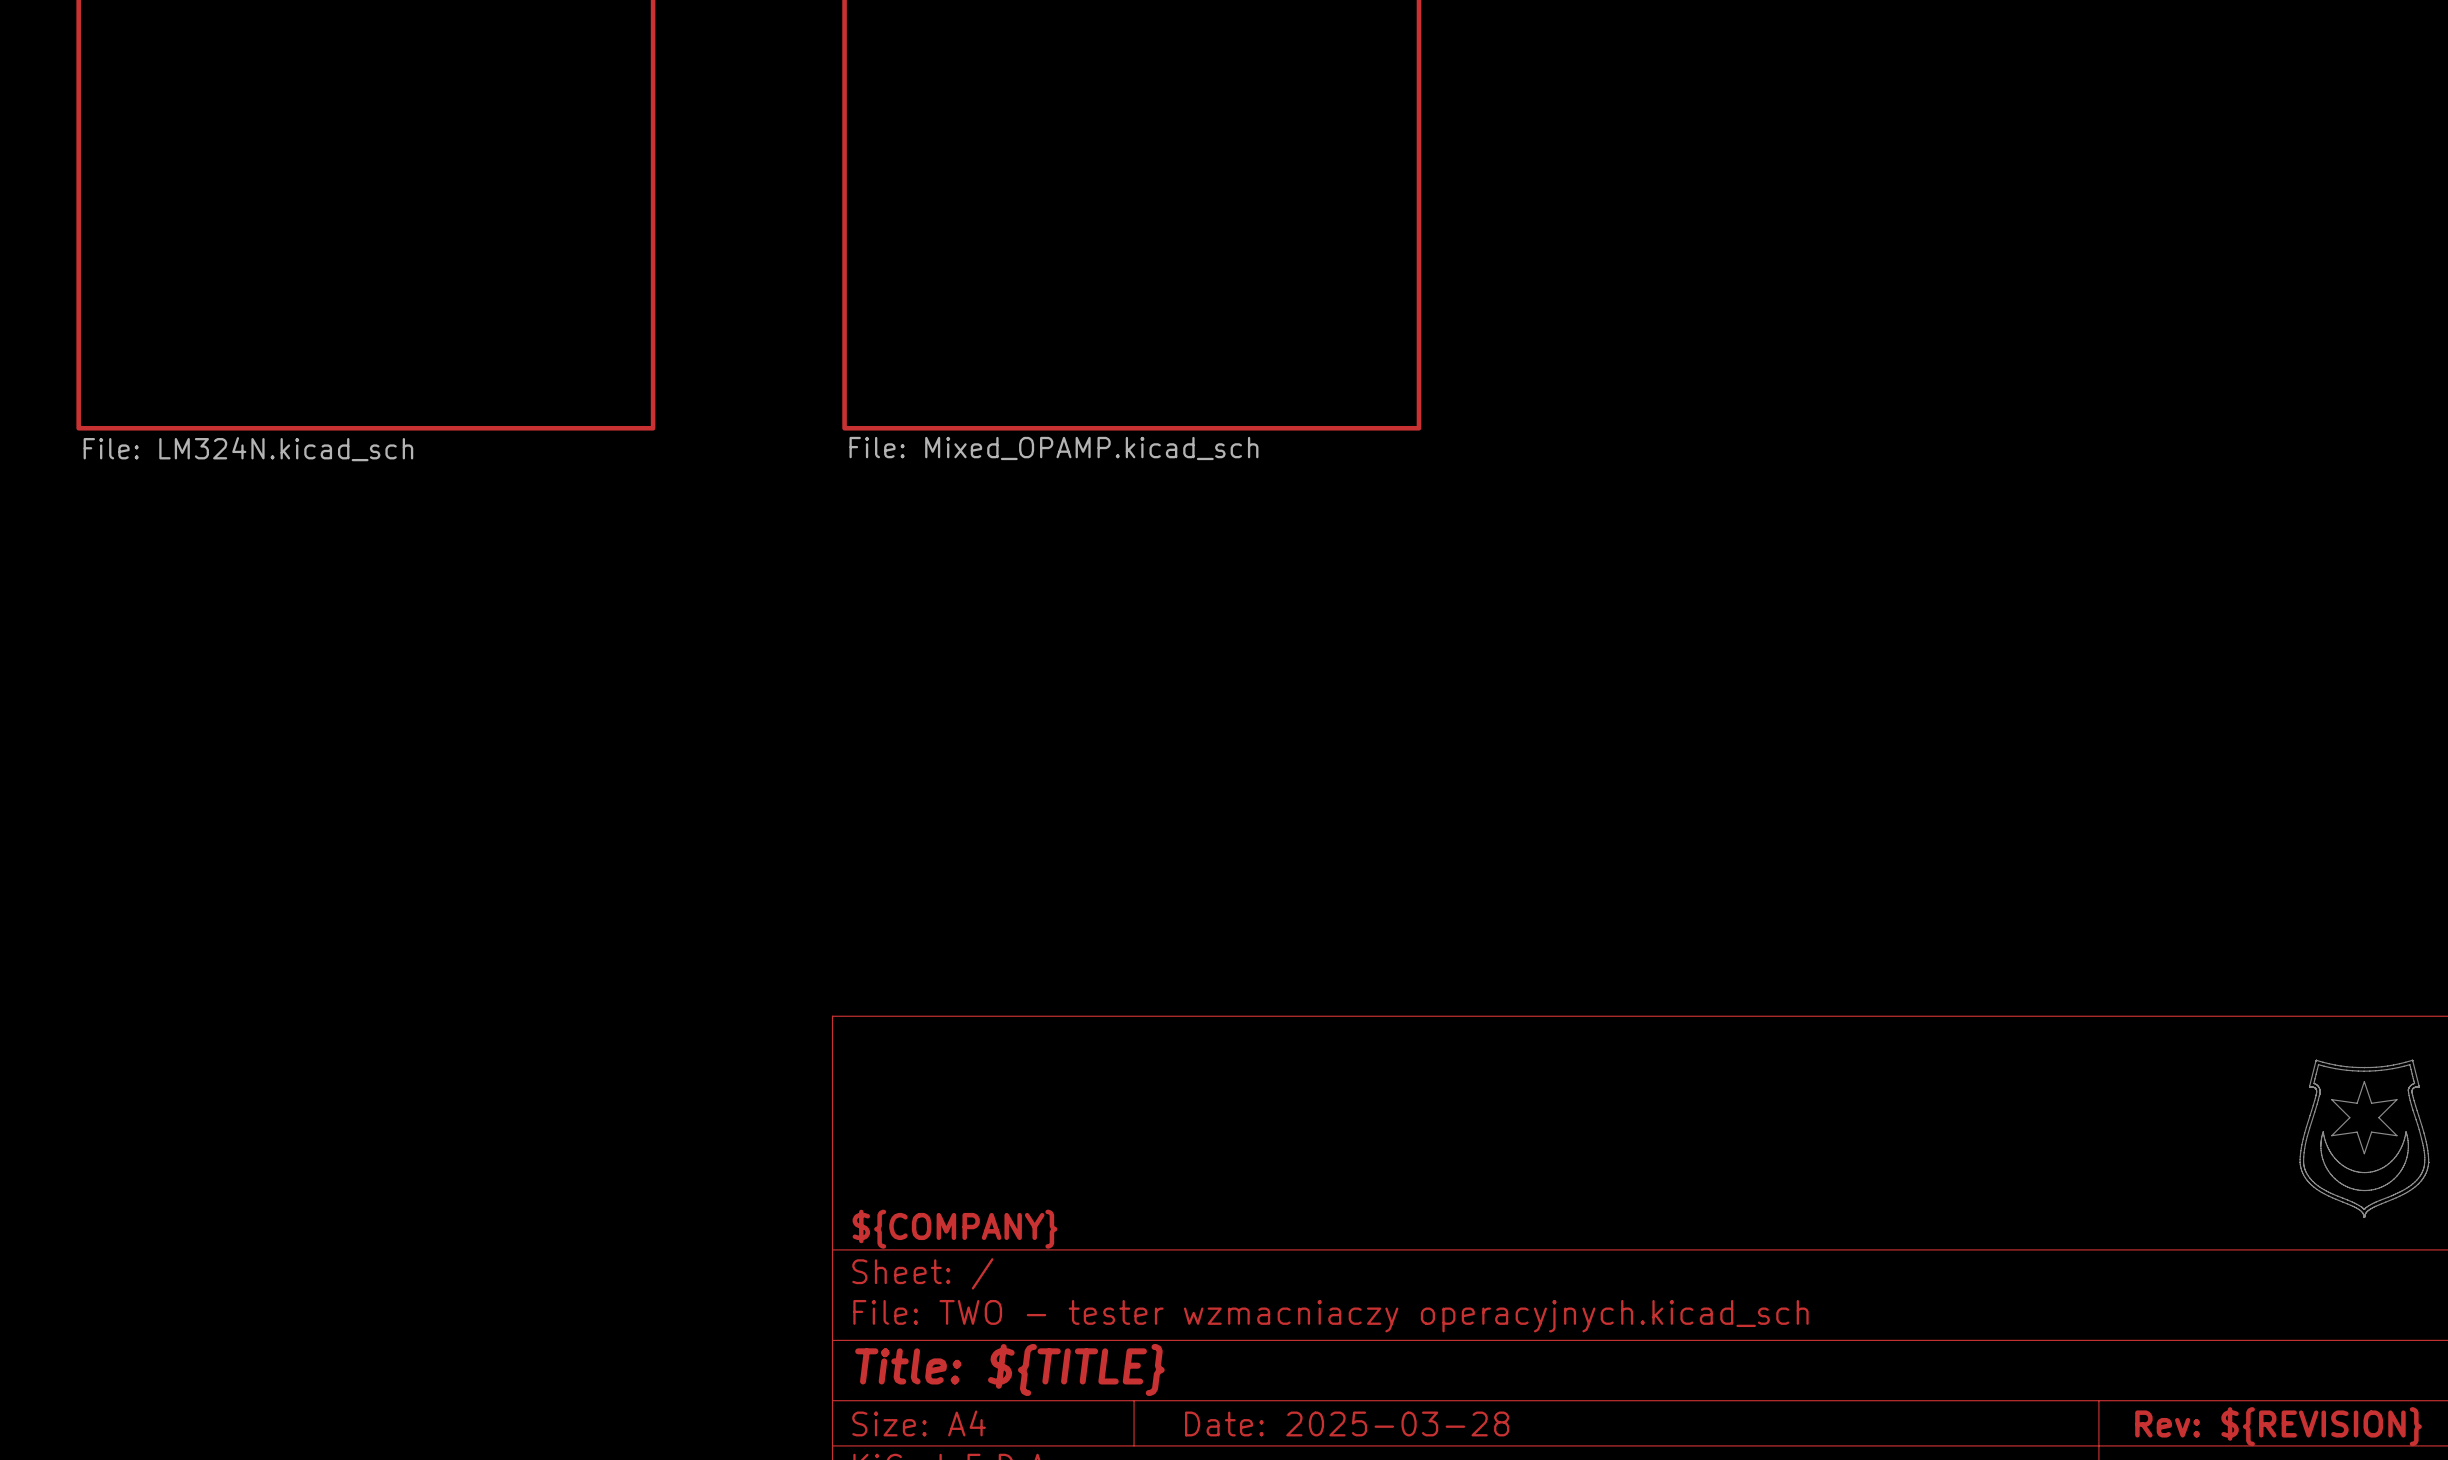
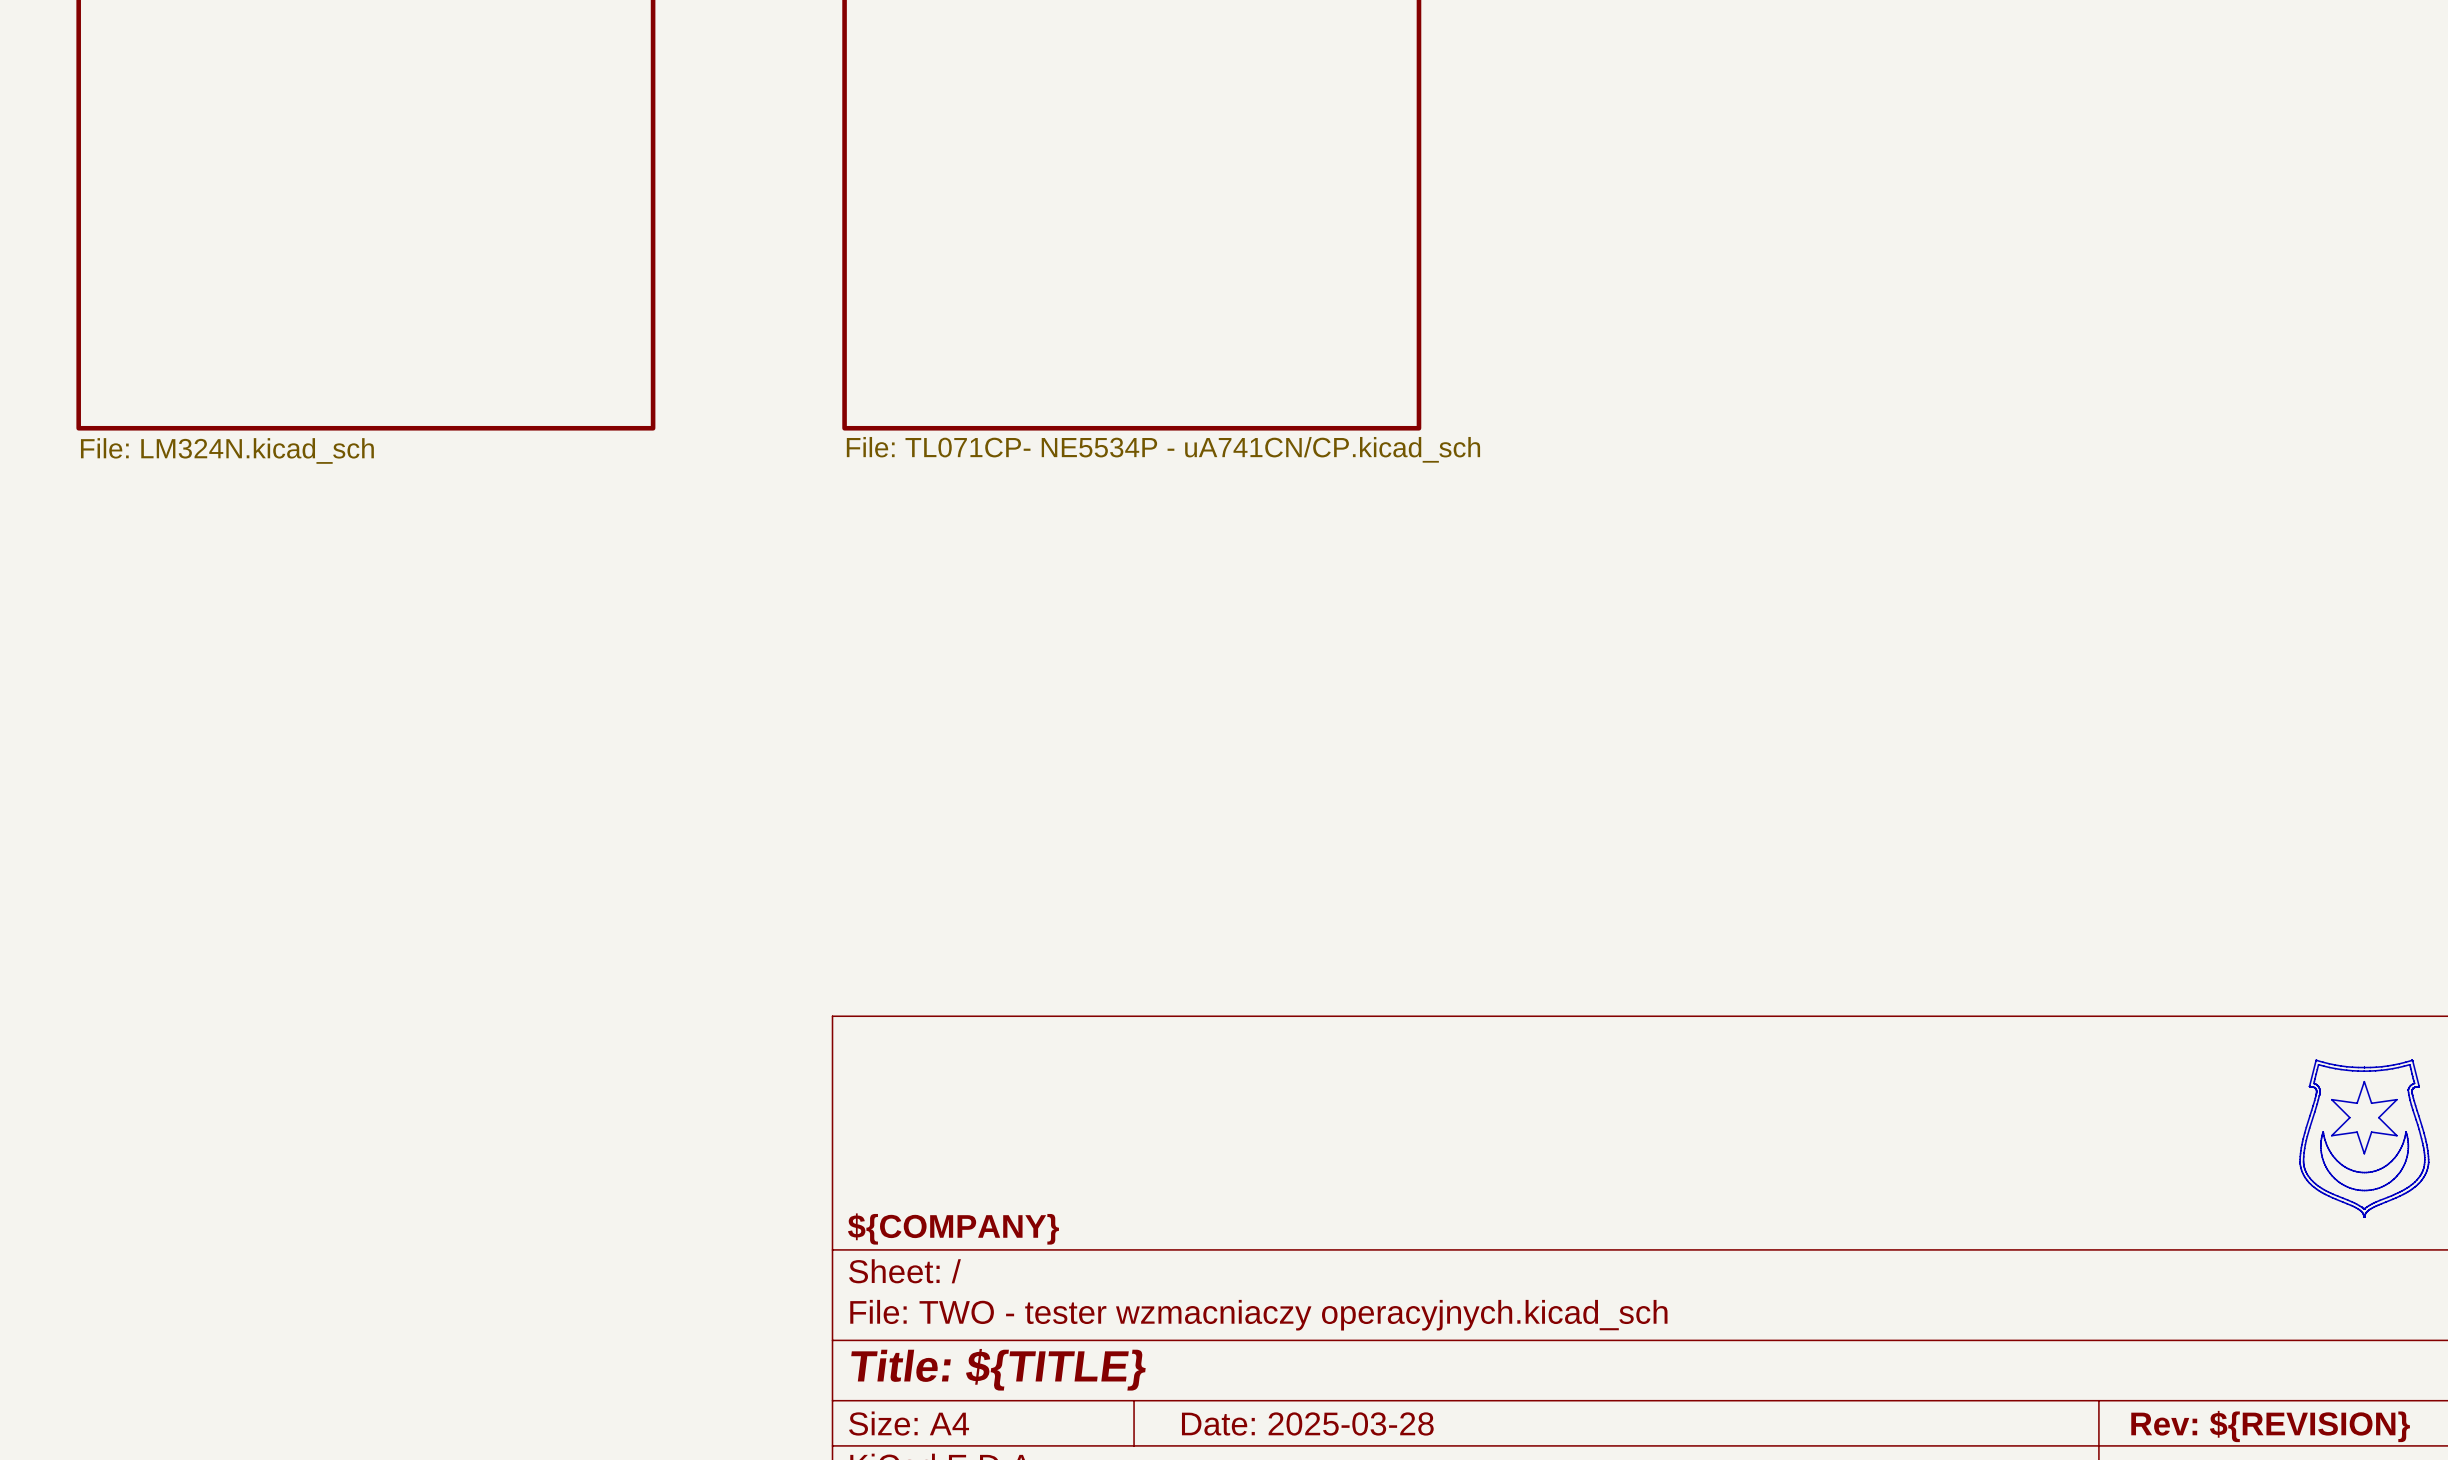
sheet value: File: Mixed_OPAMP.kicad_sch (1053, 448) -> File: TL071CP- NE5534P - uA741CN/CP.kicad_sch (1163, 449)

